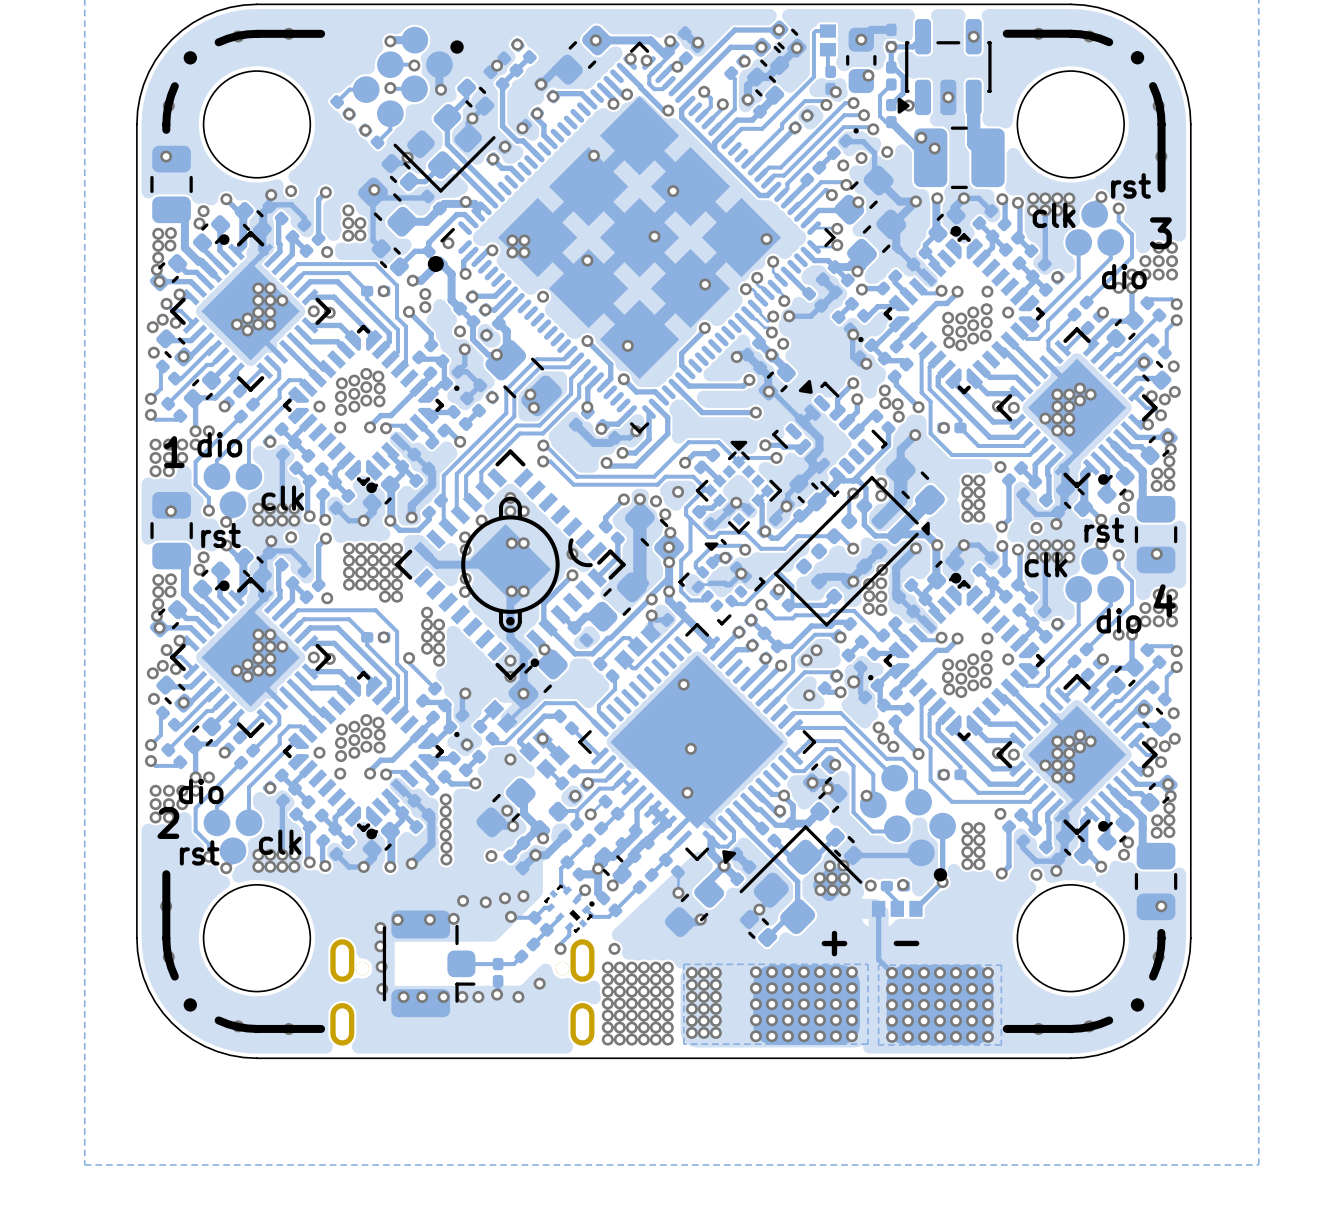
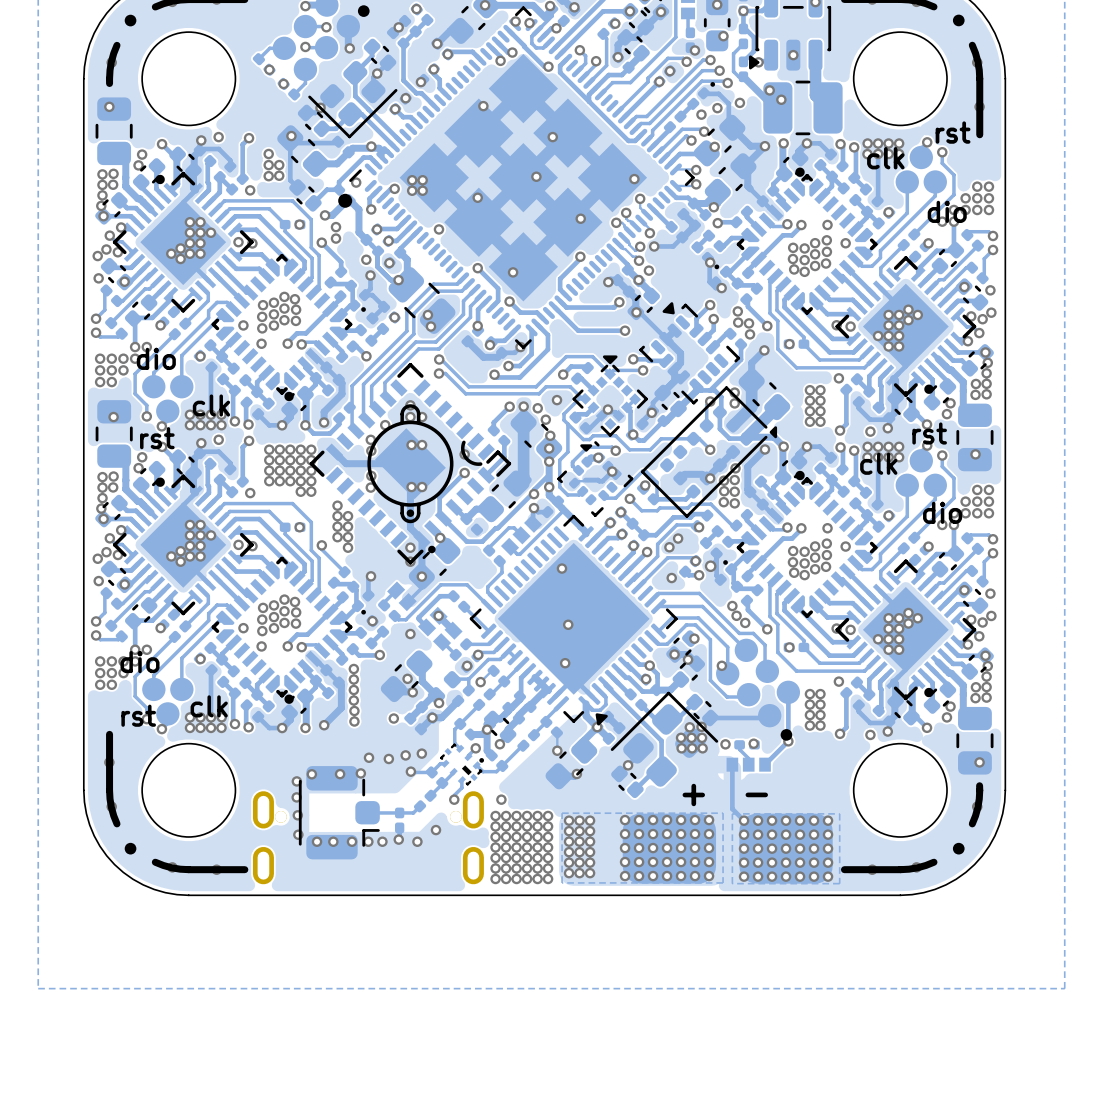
text: 3 (1160, 233) -> none
text: 1 (174, 452) -> none
text: 4 (1164, 600) -> none
text: 2 (168, 822) -> none

